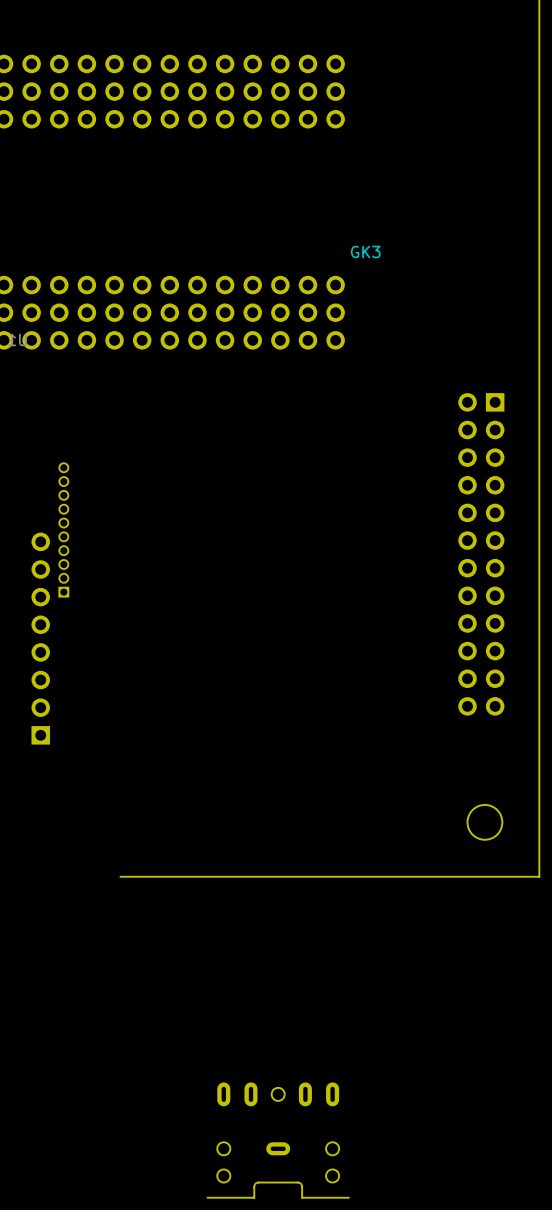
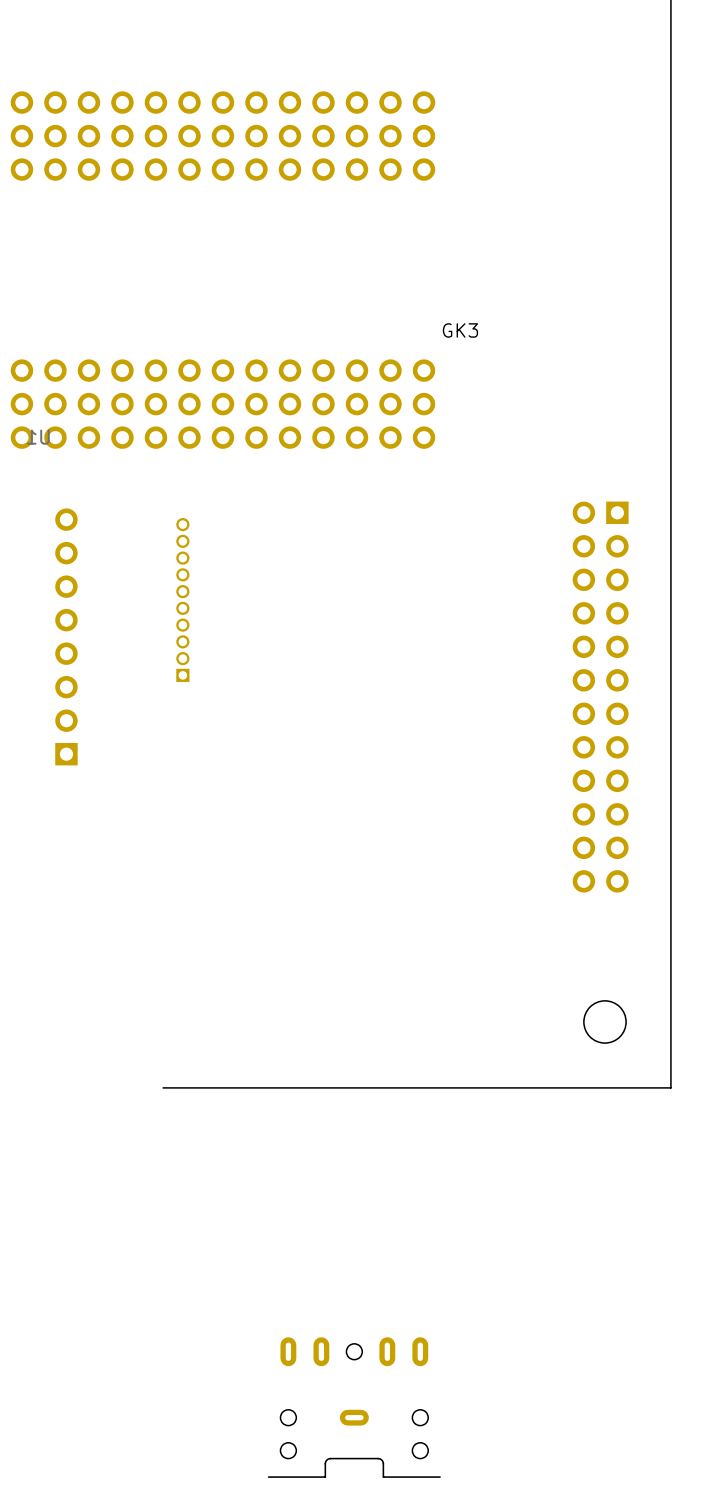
part position: (63, 529) -> (182, 599)
part position: (40, 638) -> (66, 636)

